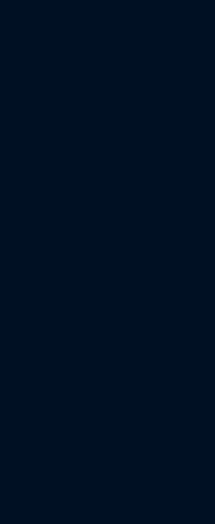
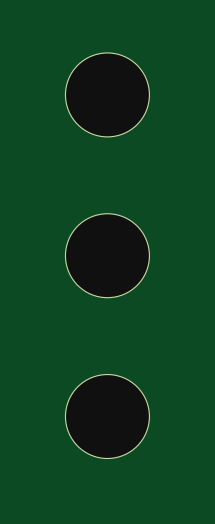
part: none -> (107, 94)
part: none -> (107, 255)
part: none -> (107, 416)

